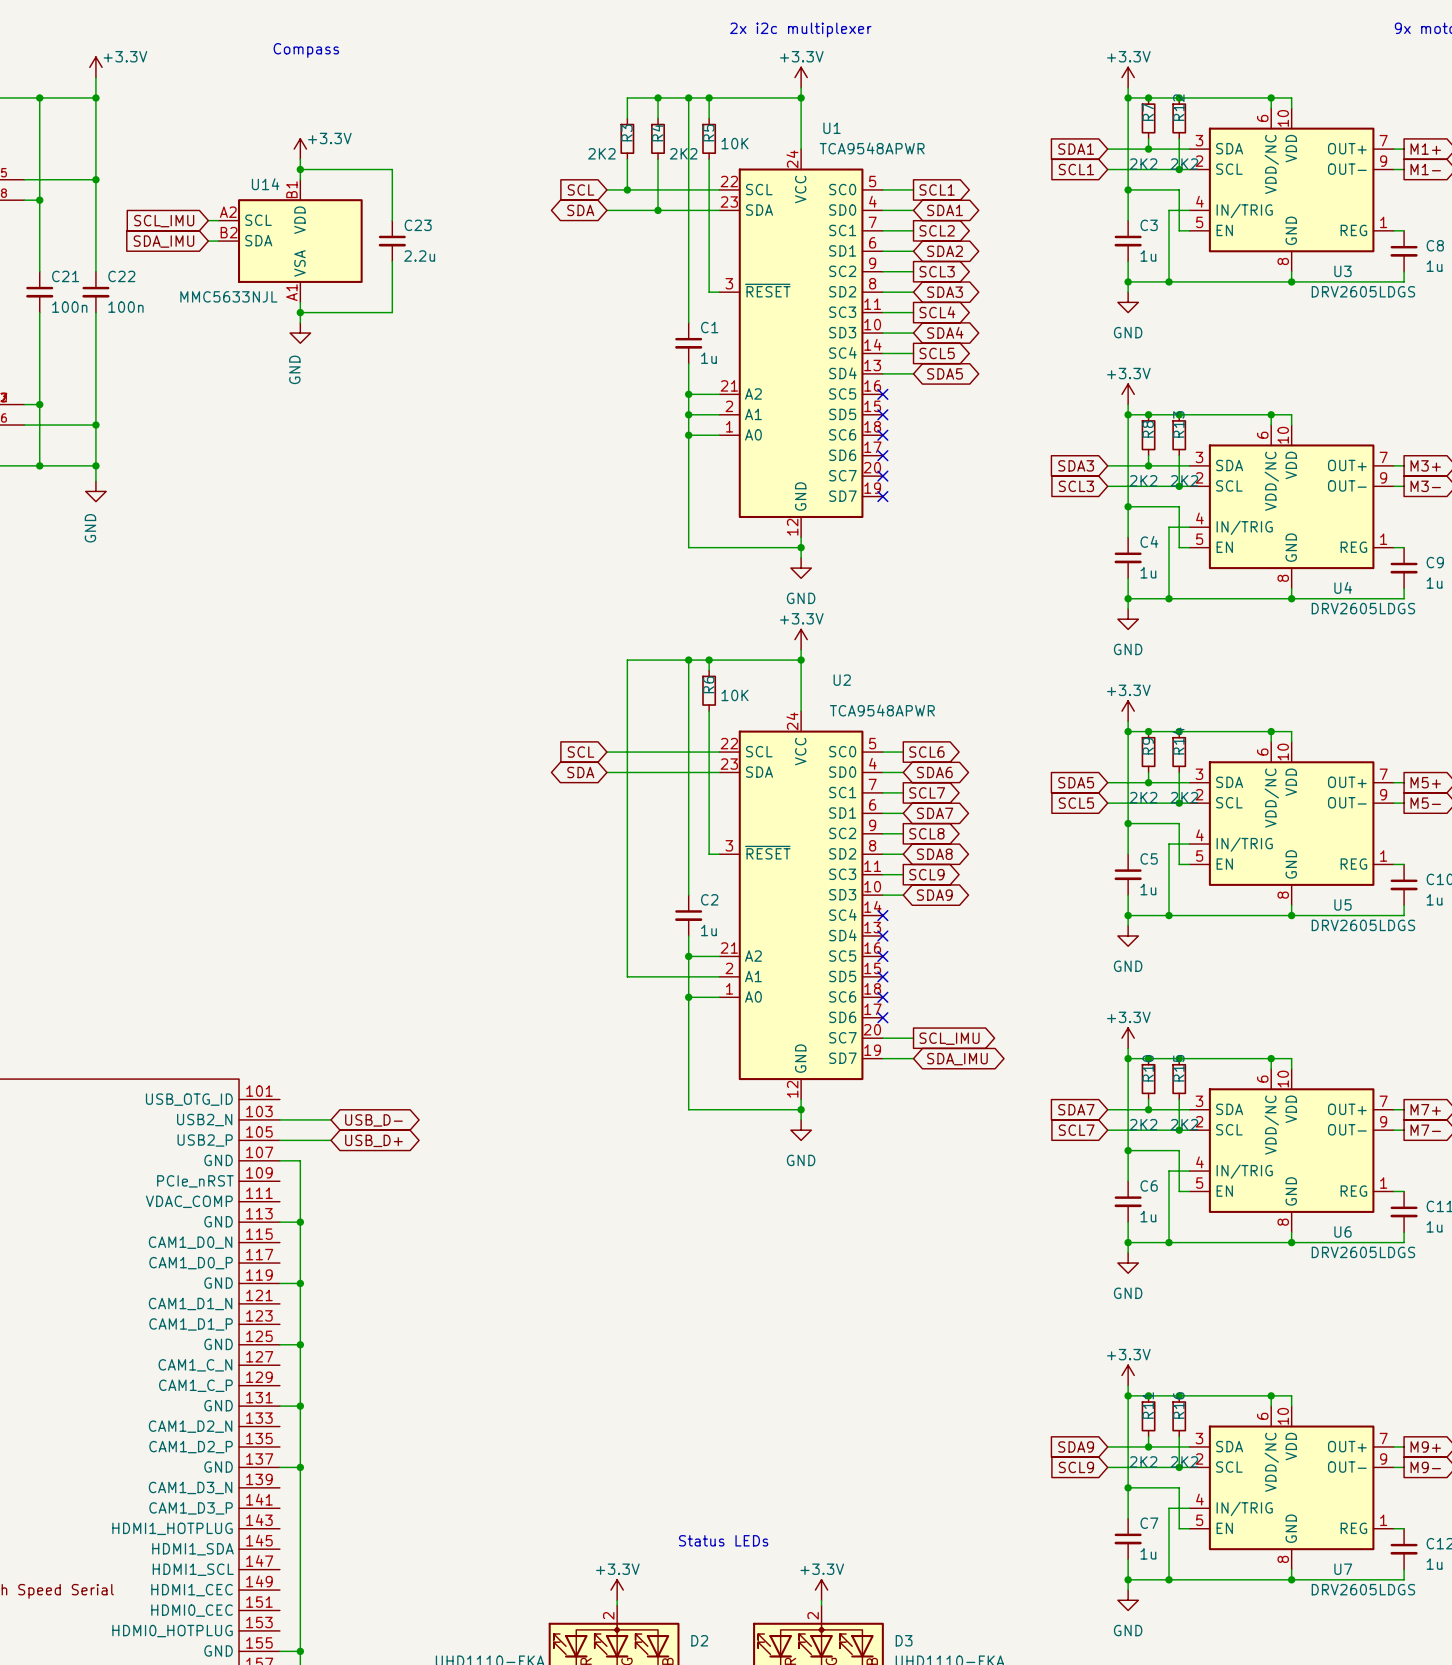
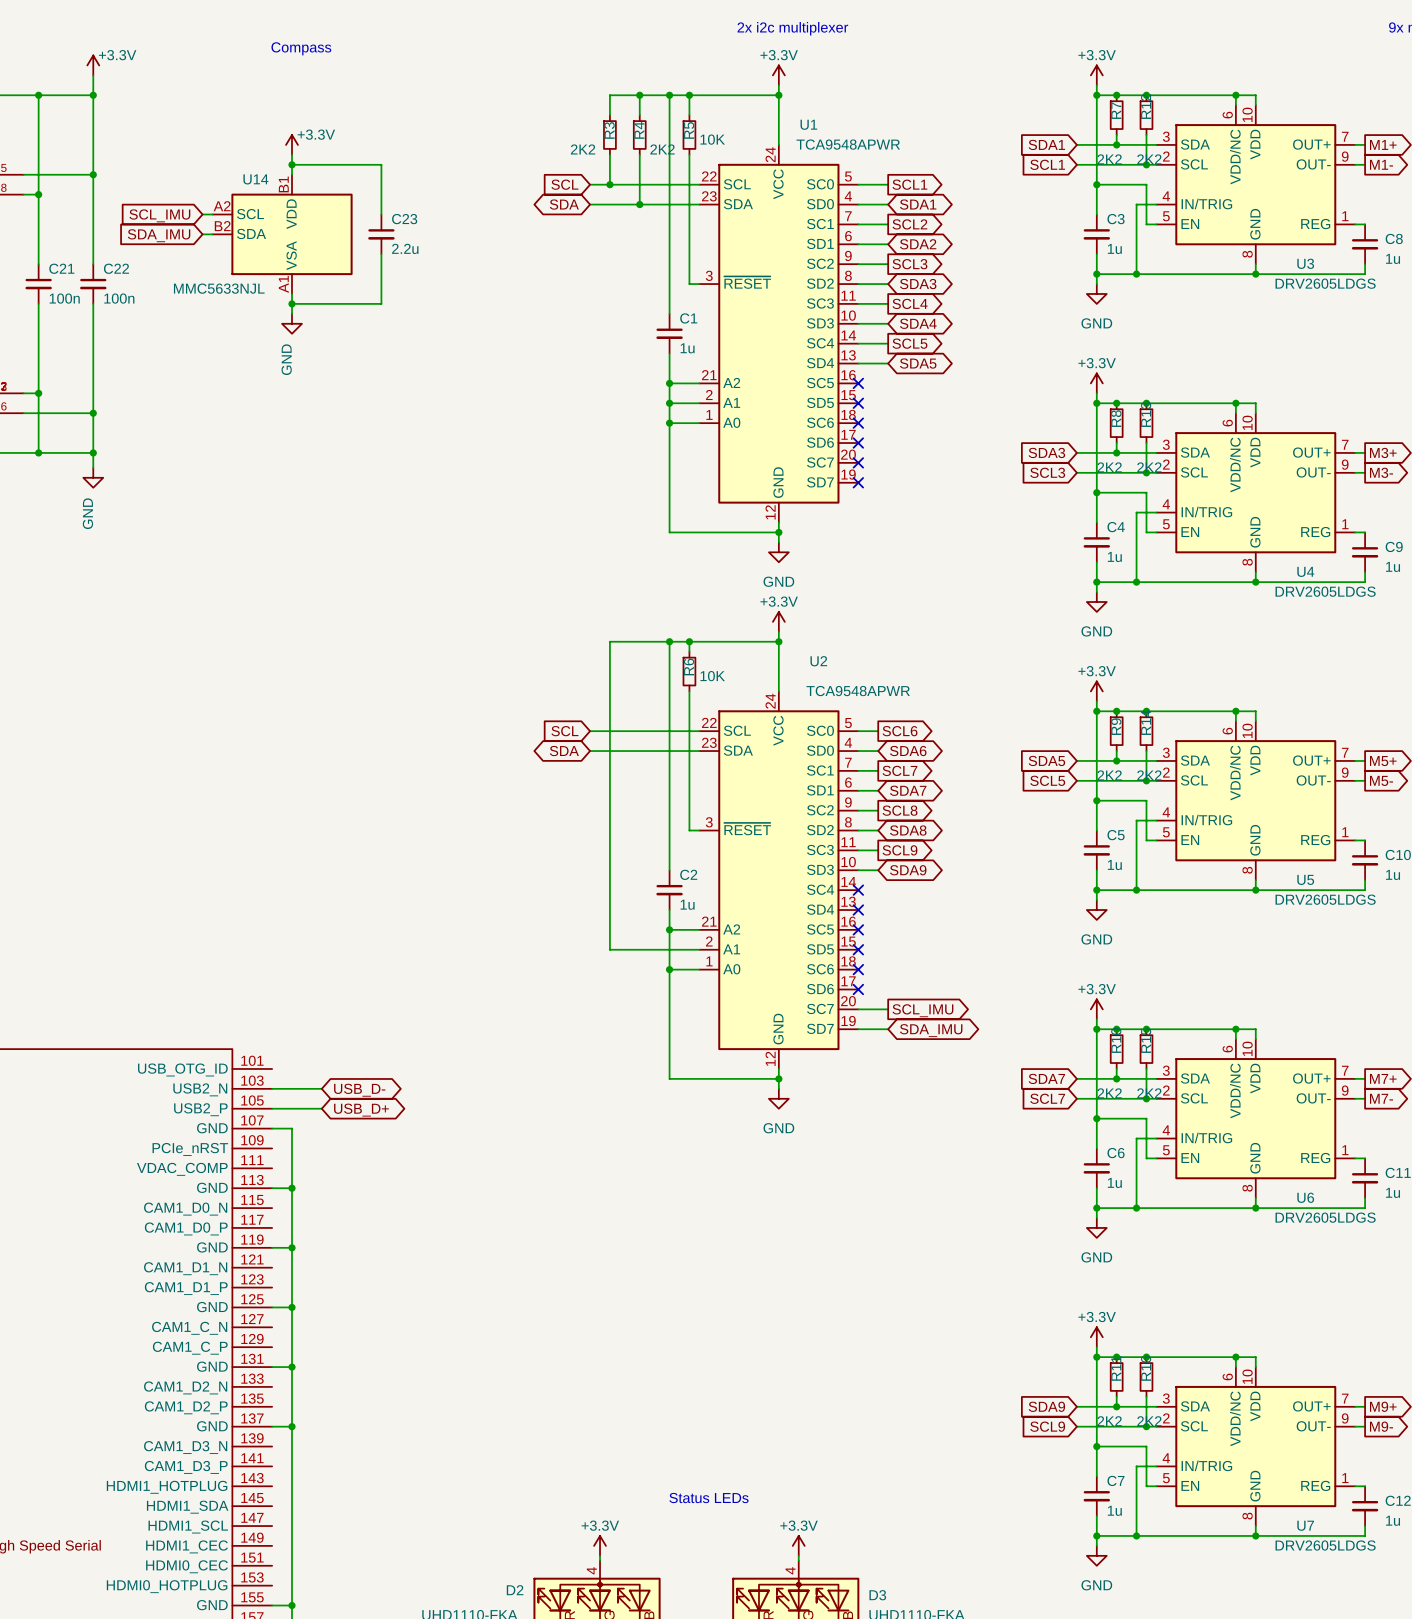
D2 pin number: 2 (608, 1615) -> 4 (591, 1570)
D3 pin number: 2 (813, 1615) -> 4 (790, 1570)
D2 name position: D2 (699, 1640) -> D2 (515, 1590)

